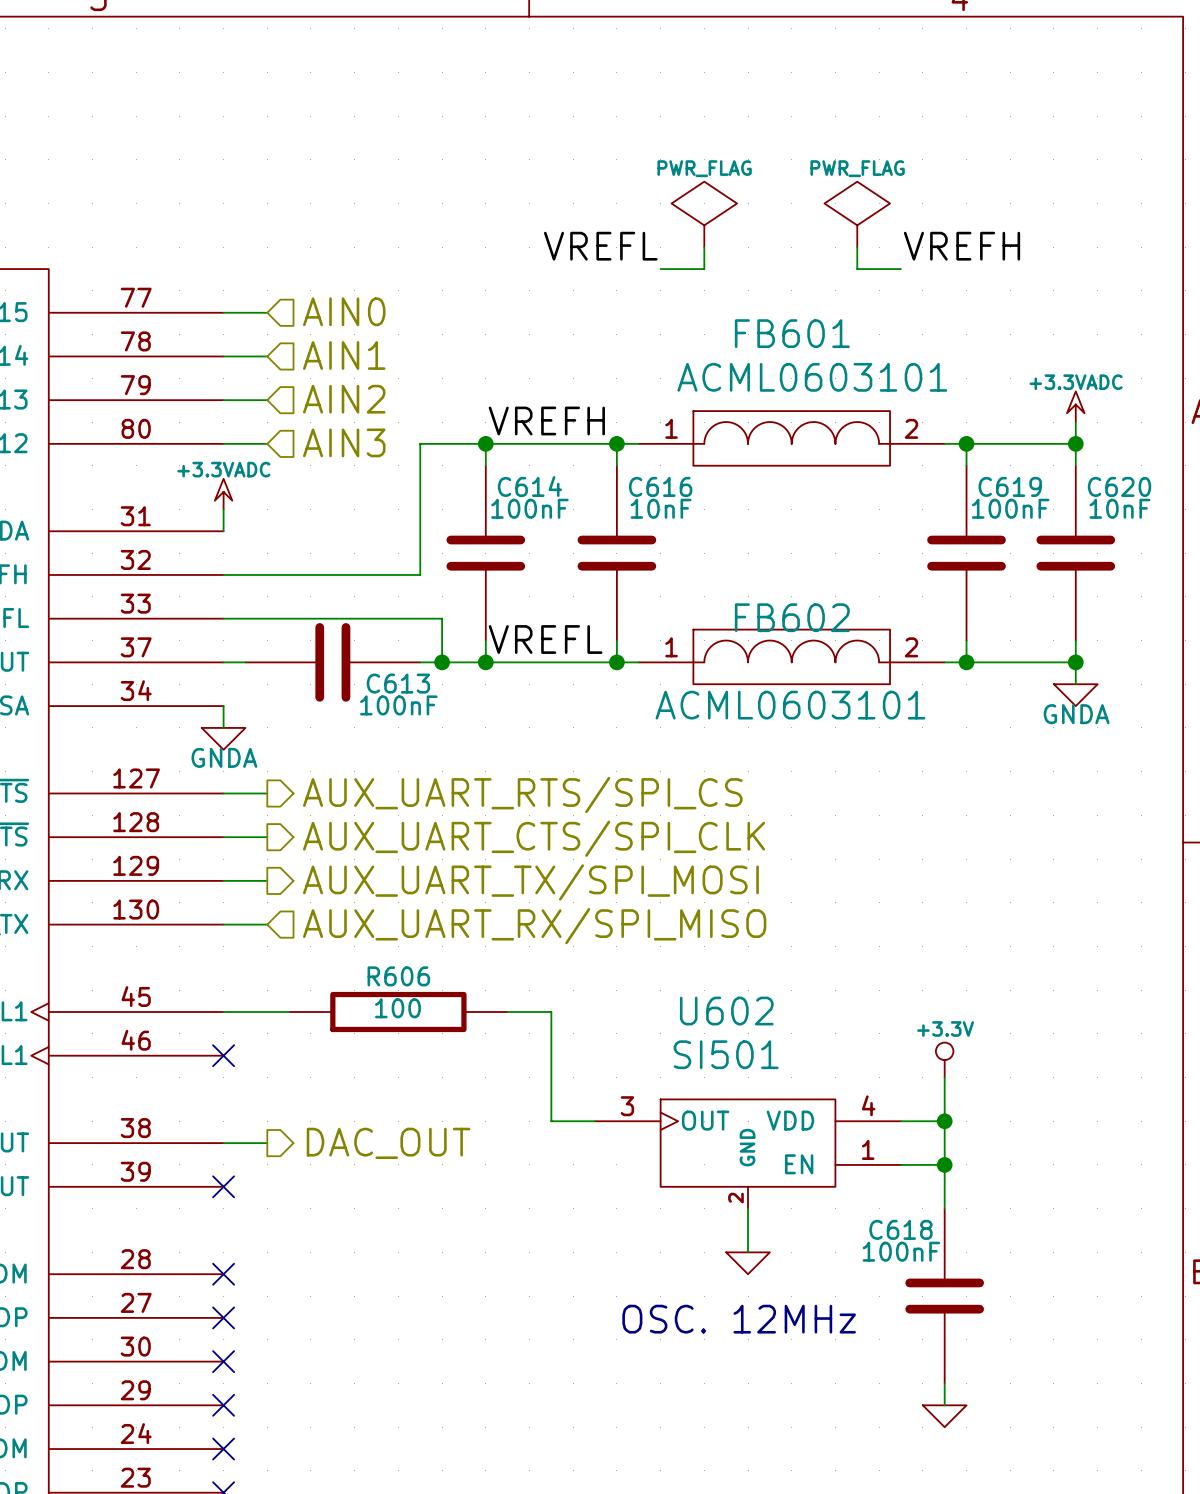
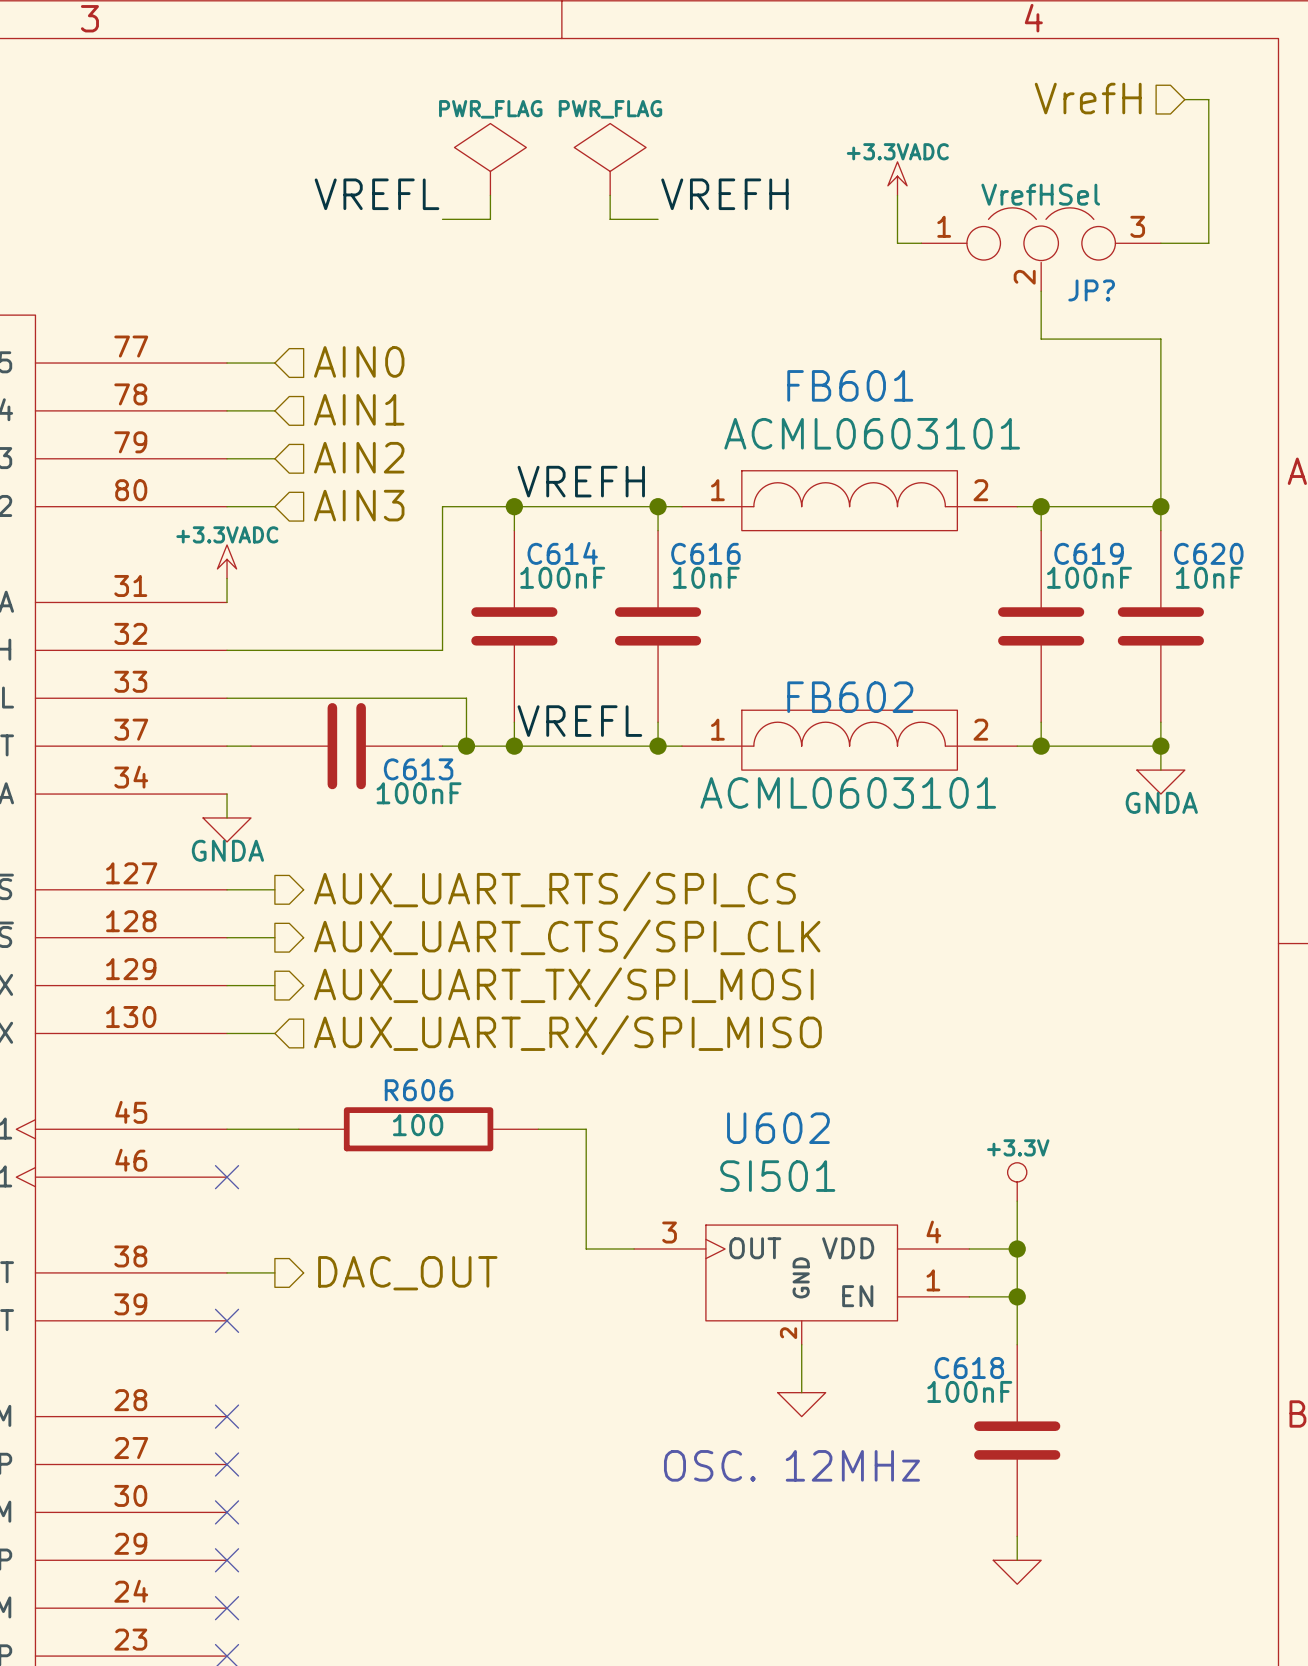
hierarchical label: none -> VrefH (1088, 98)
wire: none -> (1184, 99) (1208, 99) (1208, 243) (1160, 243)
power symbol: none -> PWR_FLAG (490, 159)
power symbol: none -> PWR_FLAG (610, 159)
wire: none -> (897, 195) (897, 243) (921, 243)
JP?: none -> VrefHSel (1041, 249)
power symbol: PWR_FLAG (704, 214) -> none
power symbol: PWR_FLAG (857, 214) -> none
label position: VREFL (600, 246) -> VREFL (377, 194)
label position: VREFH (962, 246) -> VREFH (724, 194)
wire: (704, 247) (704, 269) (660, 269) -> (490, 195) (490, 219) (442, 219)
wire: (857, 247) (857, 269) (900, 269) -> (610, 195) (610, 219) (658, 219)
wire: none -> (1041, 291) (1041, 339) (1160, 339) (1160, 482)
power symbol position: +3.3VADC (1075, 406) -> +3.3VADC (897, 178)

